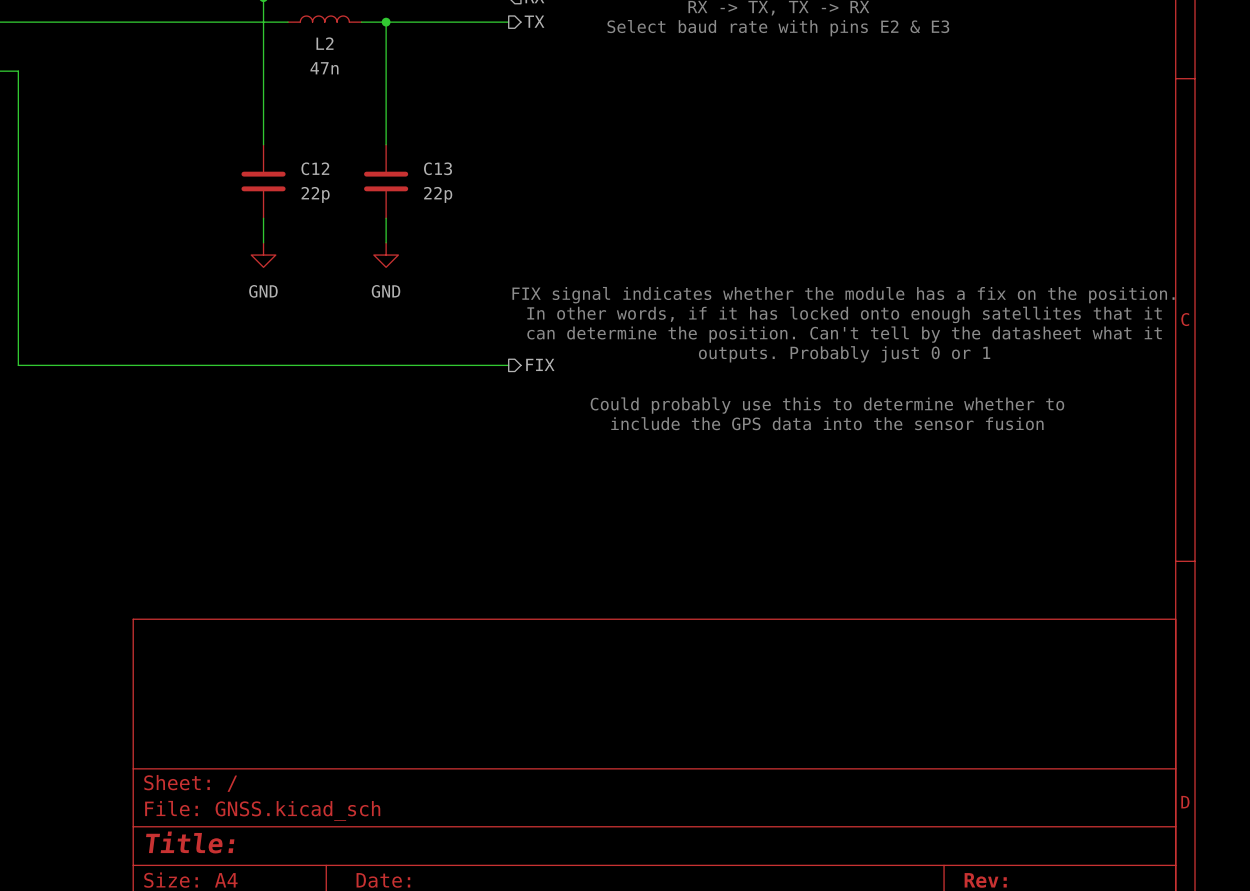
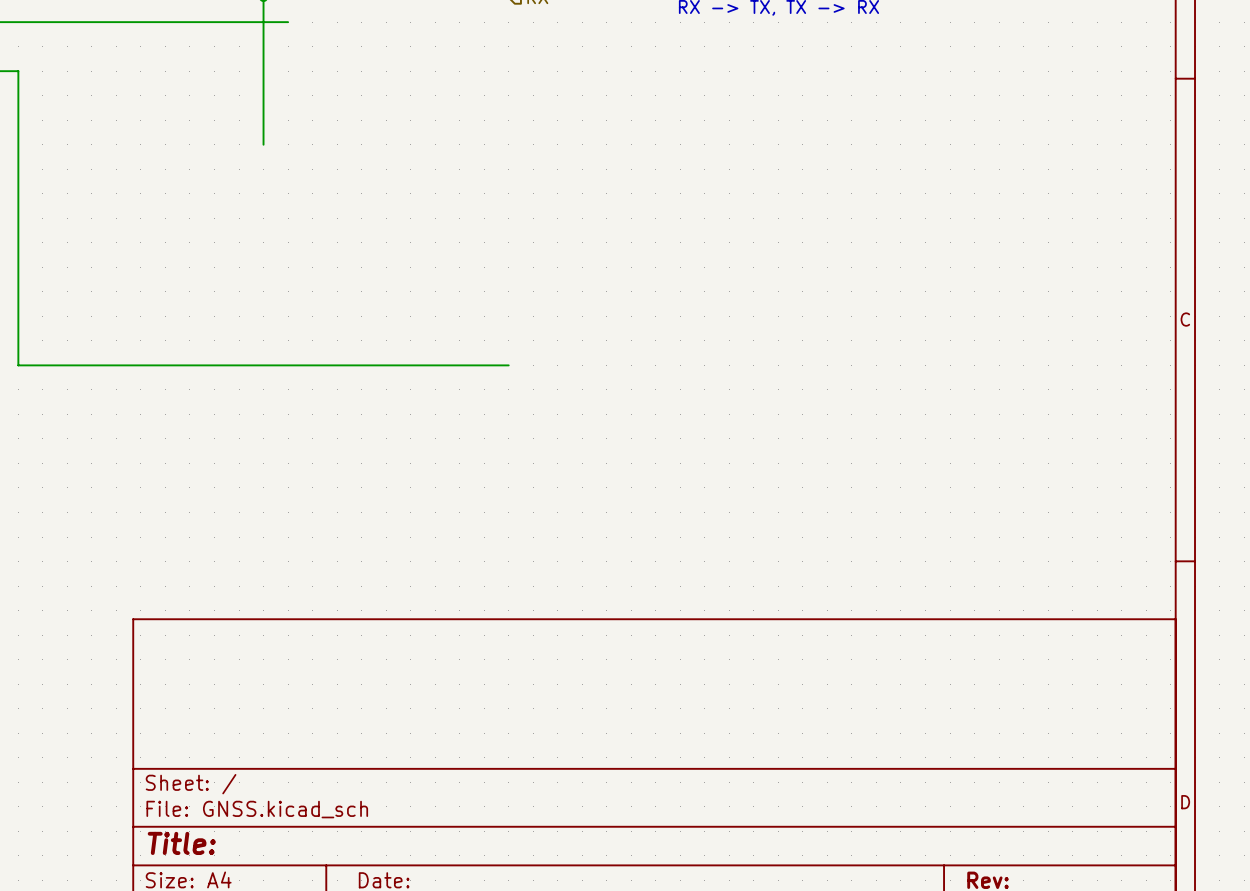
L2: 47n (324, 19) -> none
hierarchical label: TX (534, 21) -> none
wire: (361, 22) (508, 22) -> none
wire: (386, 22) (386, 144) -> none
junction: (386, 22) -> none
text: Select baud rate with pins E2 & E3 (778, 28) -> none
C12: 22p (263, 181) -> none
C13: 22p (386, 181) -> none
wire: (263, 218) (263, 242) -> none
wire: (386, 218) (386, 242) -> none
power symbol: GND (263, 255) -> none
power symbol: GND (386, 255) -> none
text: FIX signal indicates whether the module has a fix on the position. (843, 295) -> none
text: In other words, if it has locked onto enough satellites that it (844, 314) -> none
text: can determine the position. Can't tell by the datasheet what it (844, 334) -> none
text: outputs. Probably just 0 or 1 (844, 354) -> none
hierarchical label: FIX (540, 364) -> none
text: Could probably use this to determine whether to (827, 405) -> none
text: include the GPS data into the sensor fusion (827, 423) -> none

